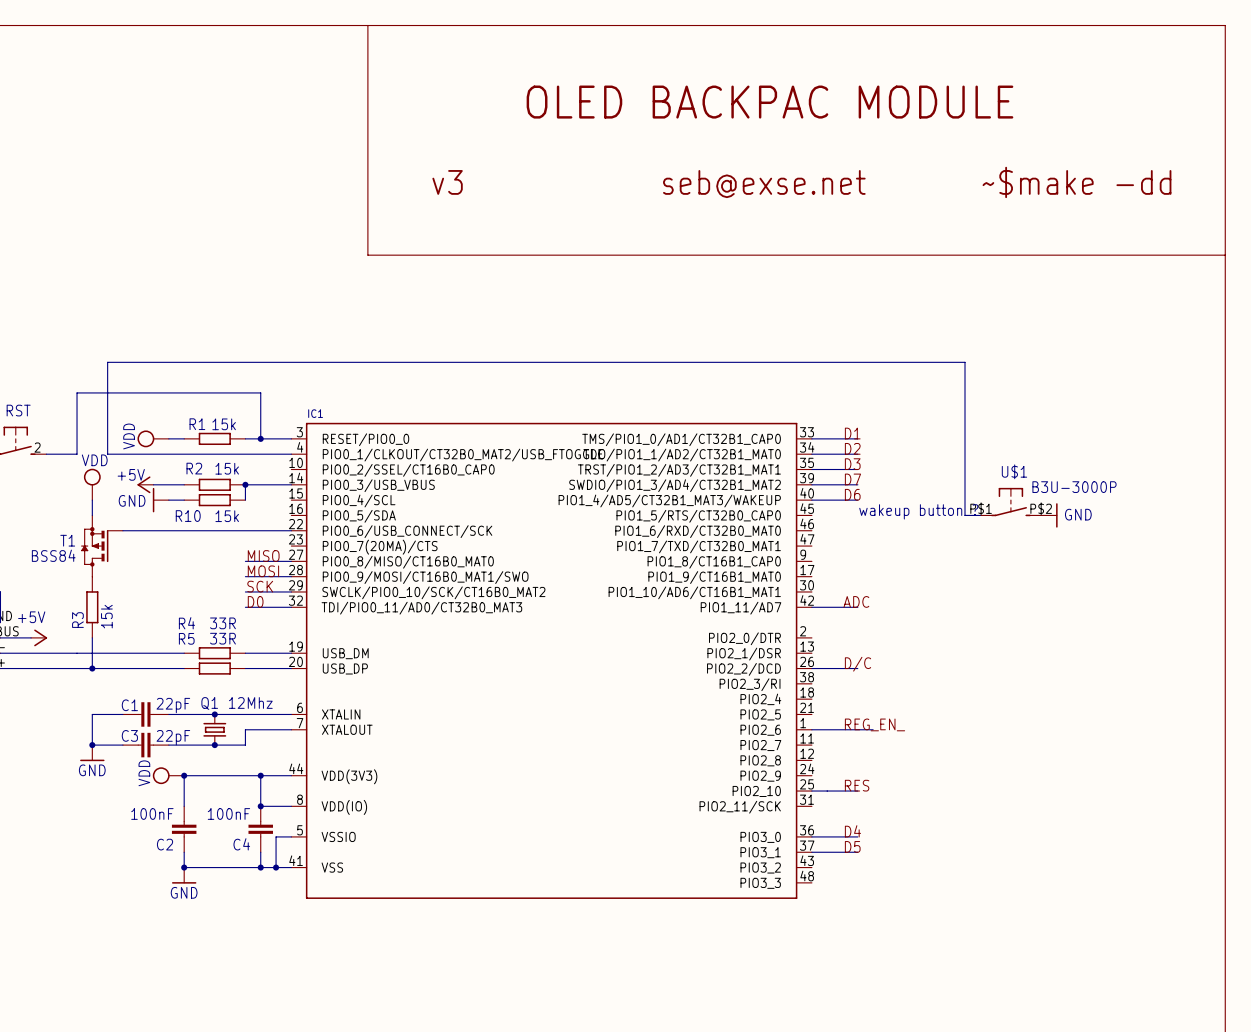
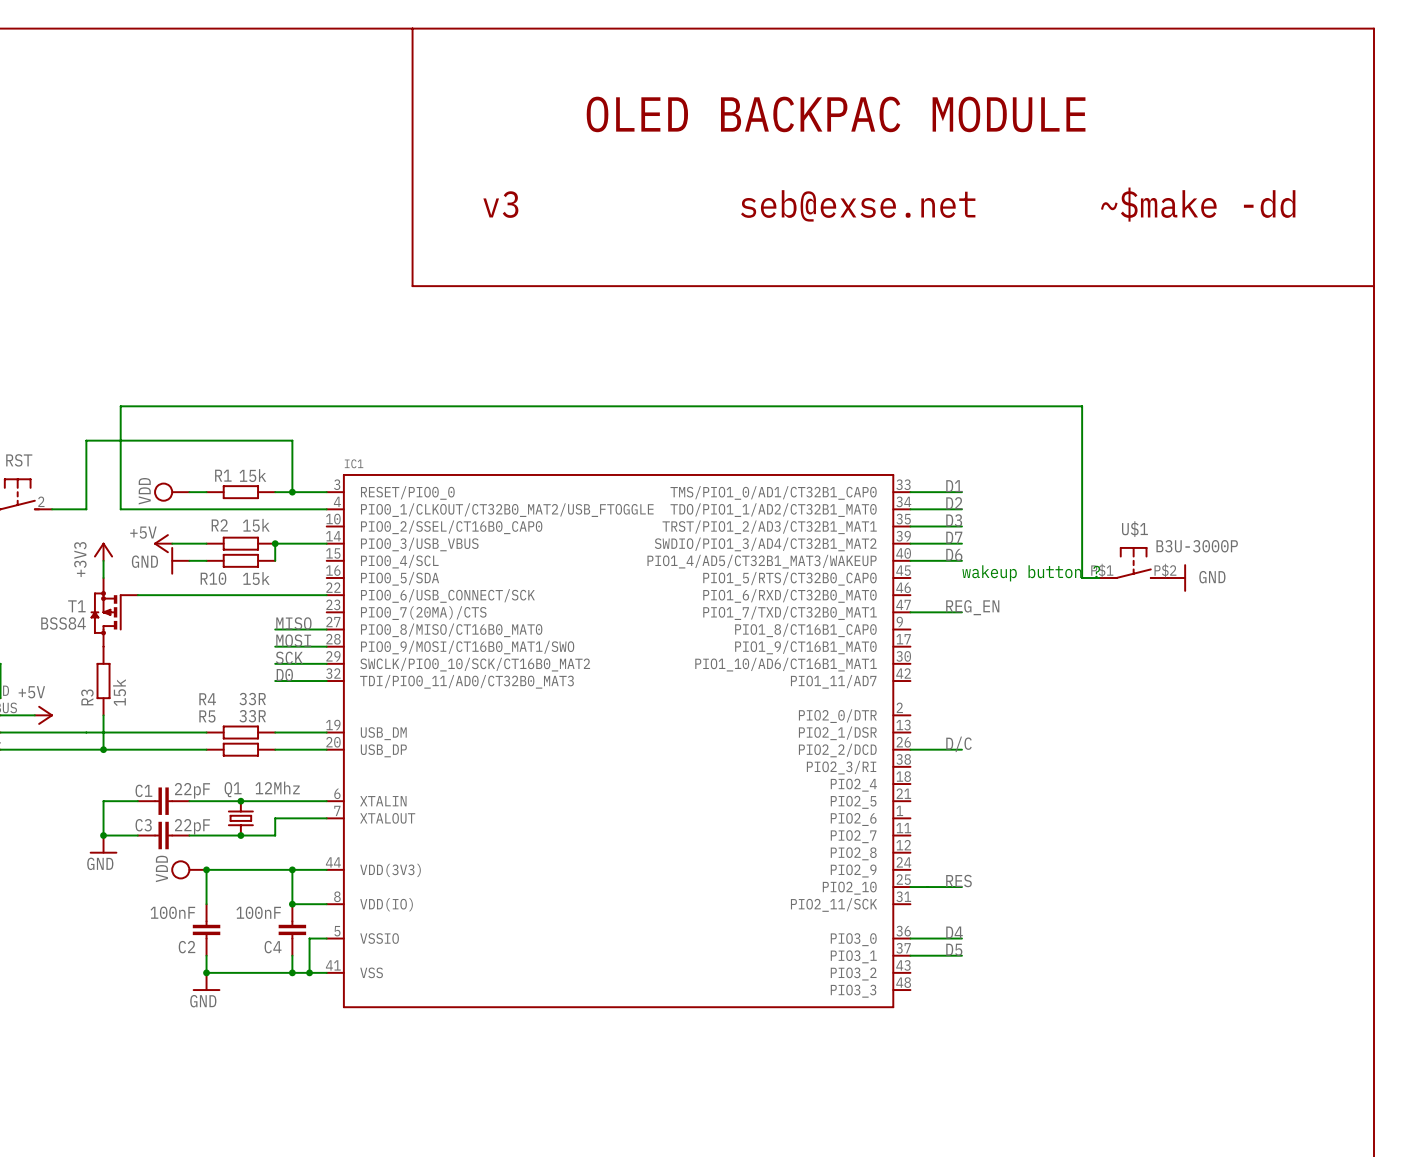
power symbol: VDD (92, 484) -> none
power symbol: none -> +3V3 (103, 551)
label: none -> REG_EN (972, 607)
label: ADC (856, 601) -> none
wire: (811, 607) (857, 607) -> (910, 612) (961, 612)
label: REG_EN_ (875, 724) -> none
wire: (811, 729) (873, 729) -> none

